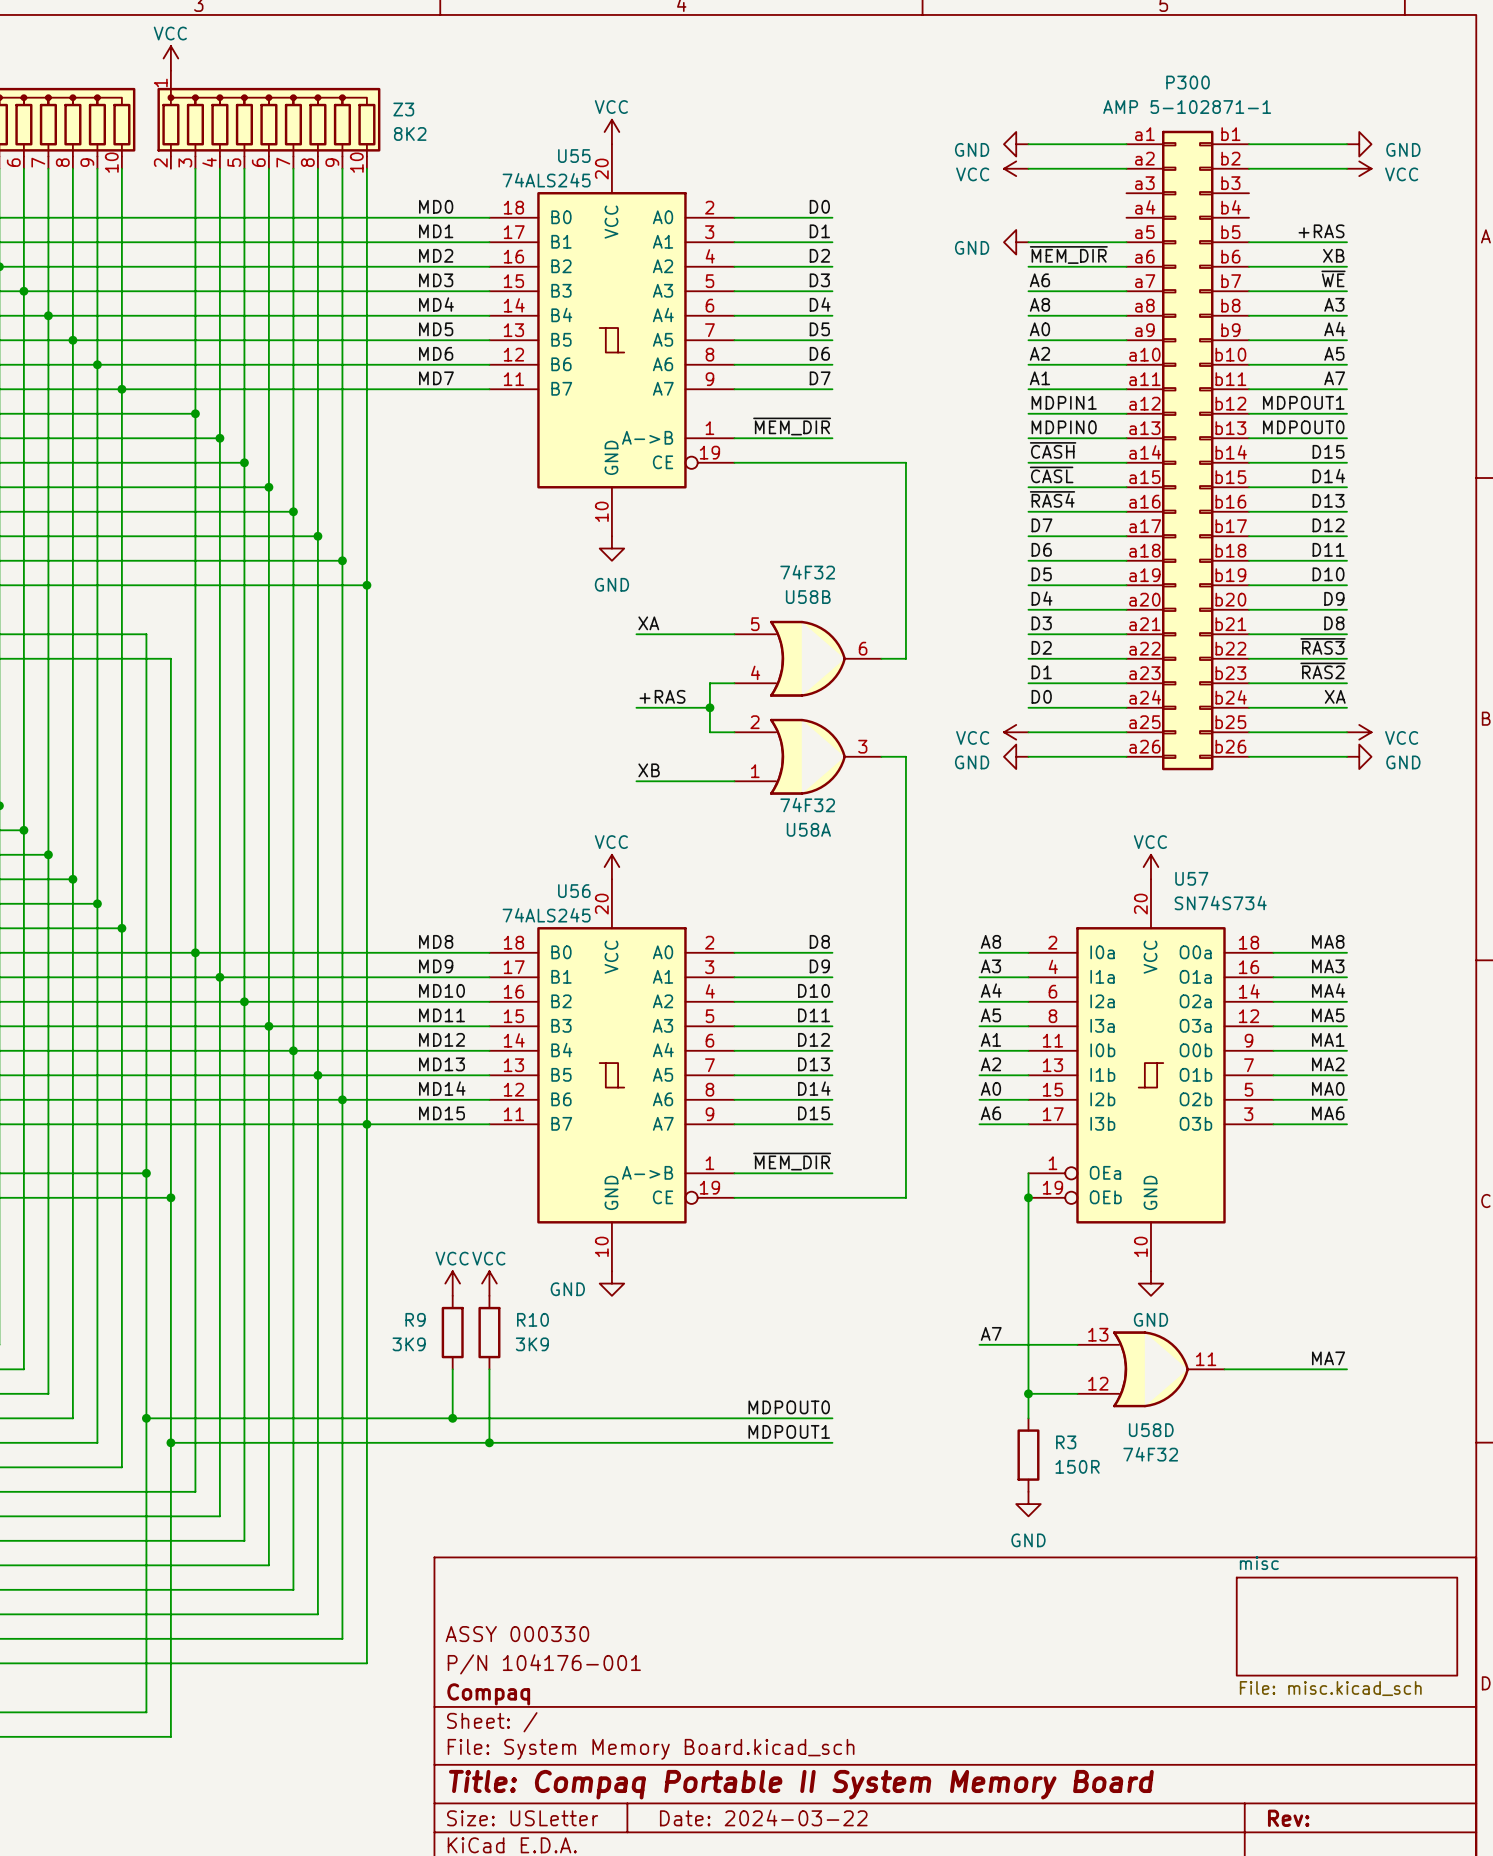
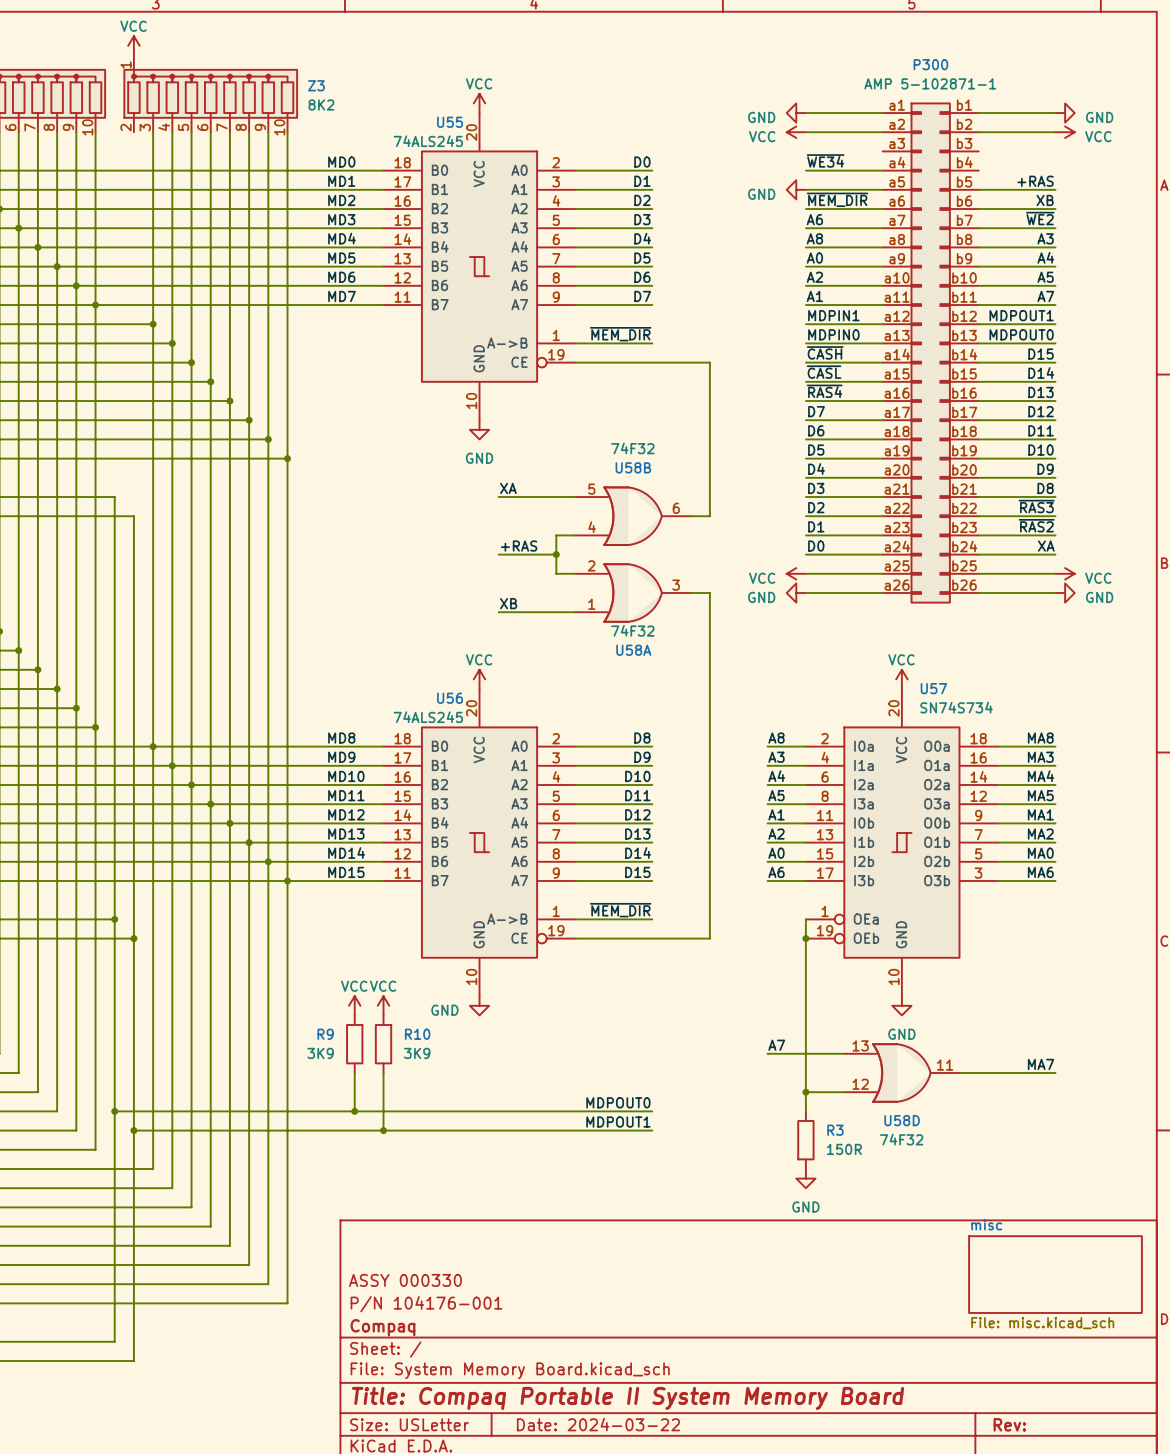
label: none -> ~{WE34} (825, 160)
wire: none -> (805, 170) (882, 170)
label: ~{WE} (1333, 278) -> ~{WE2} (1040, 218)

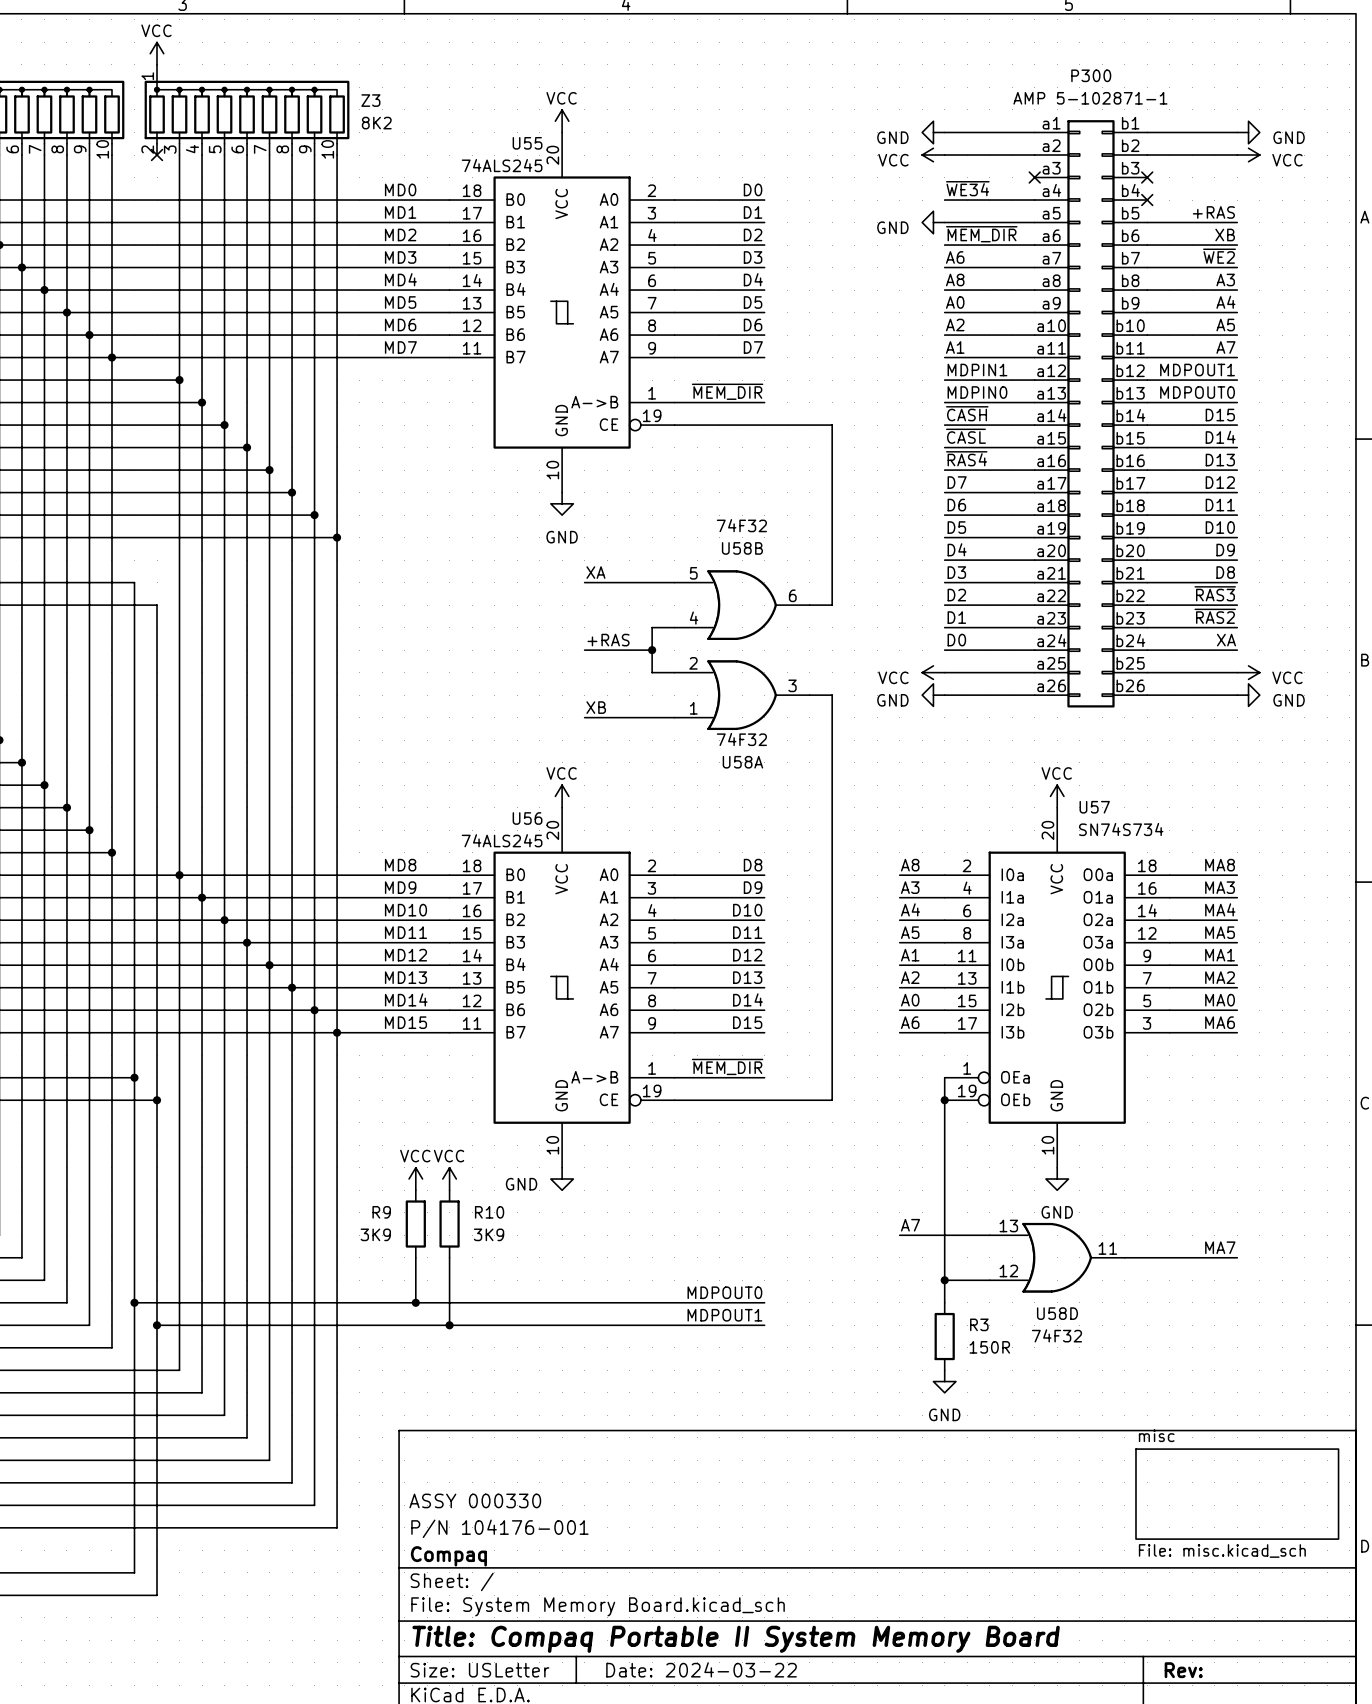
no-connect mark: none -> (157, 155)
no-connect mark: none -> (1034, 177)
no-connect mark: none -> (1147, 177)
no-connect mark: none -> (1147, 200)

